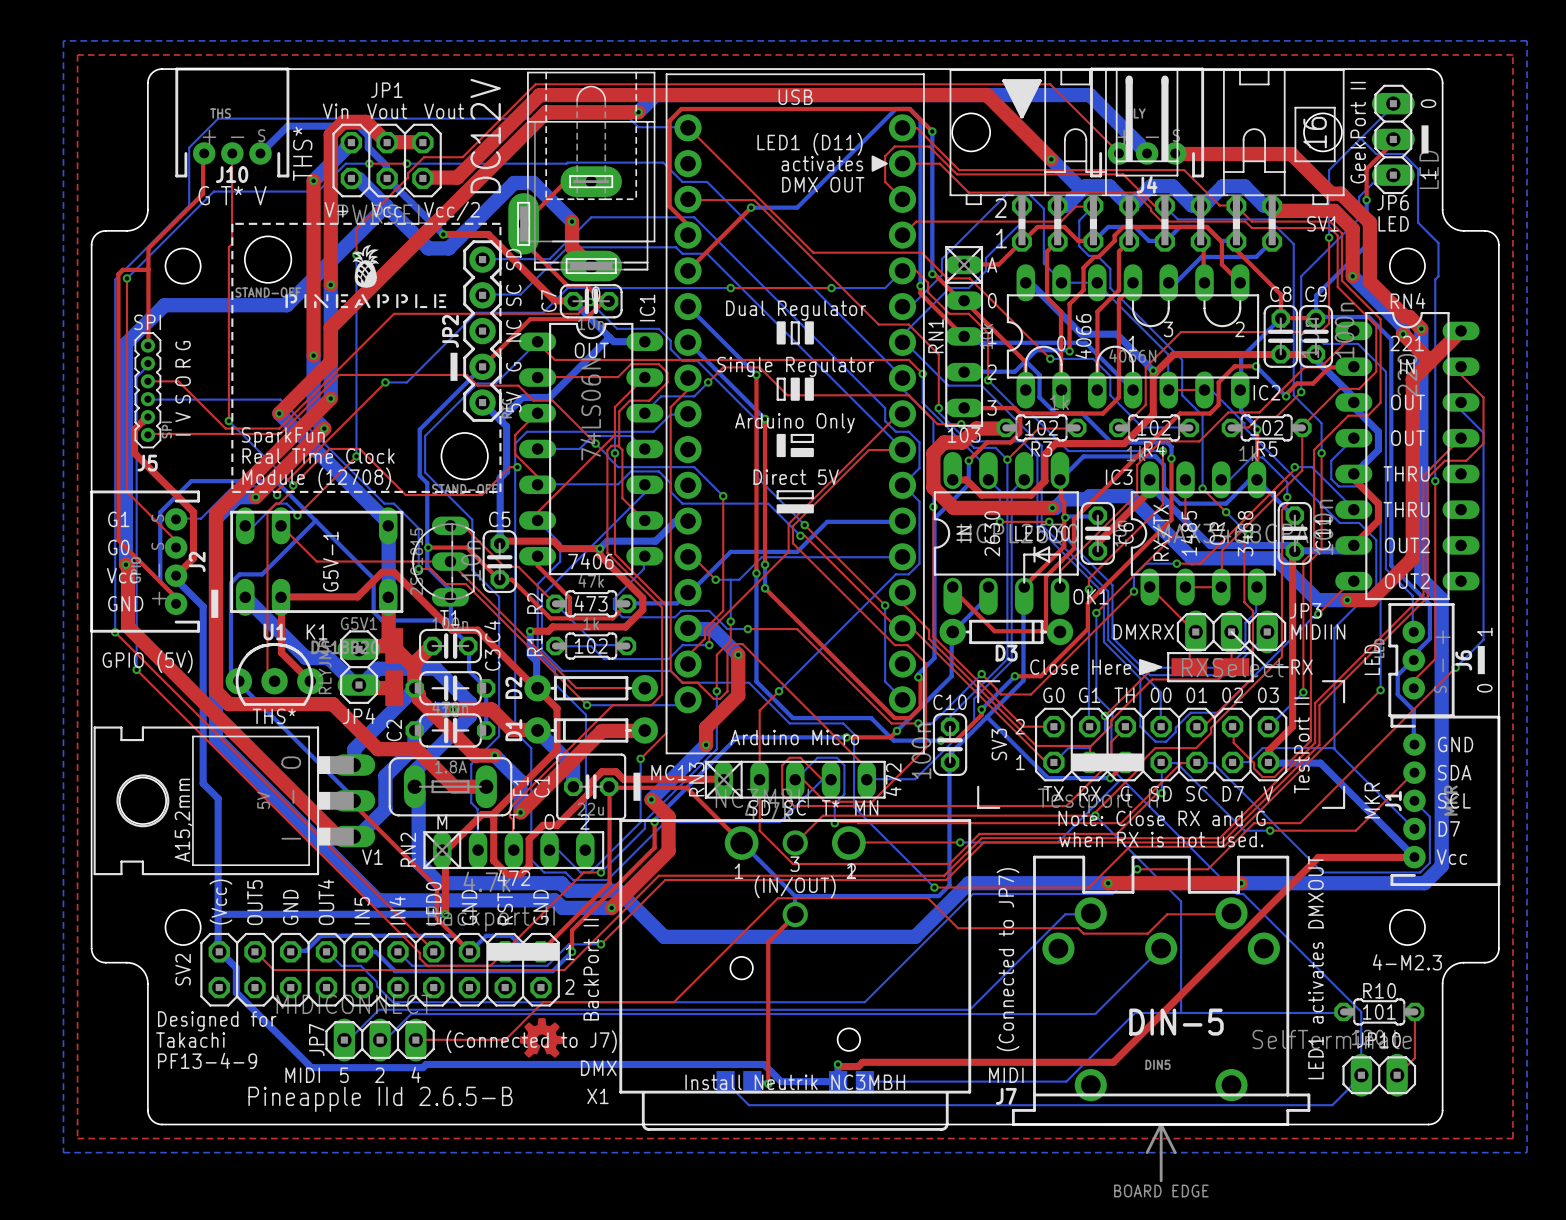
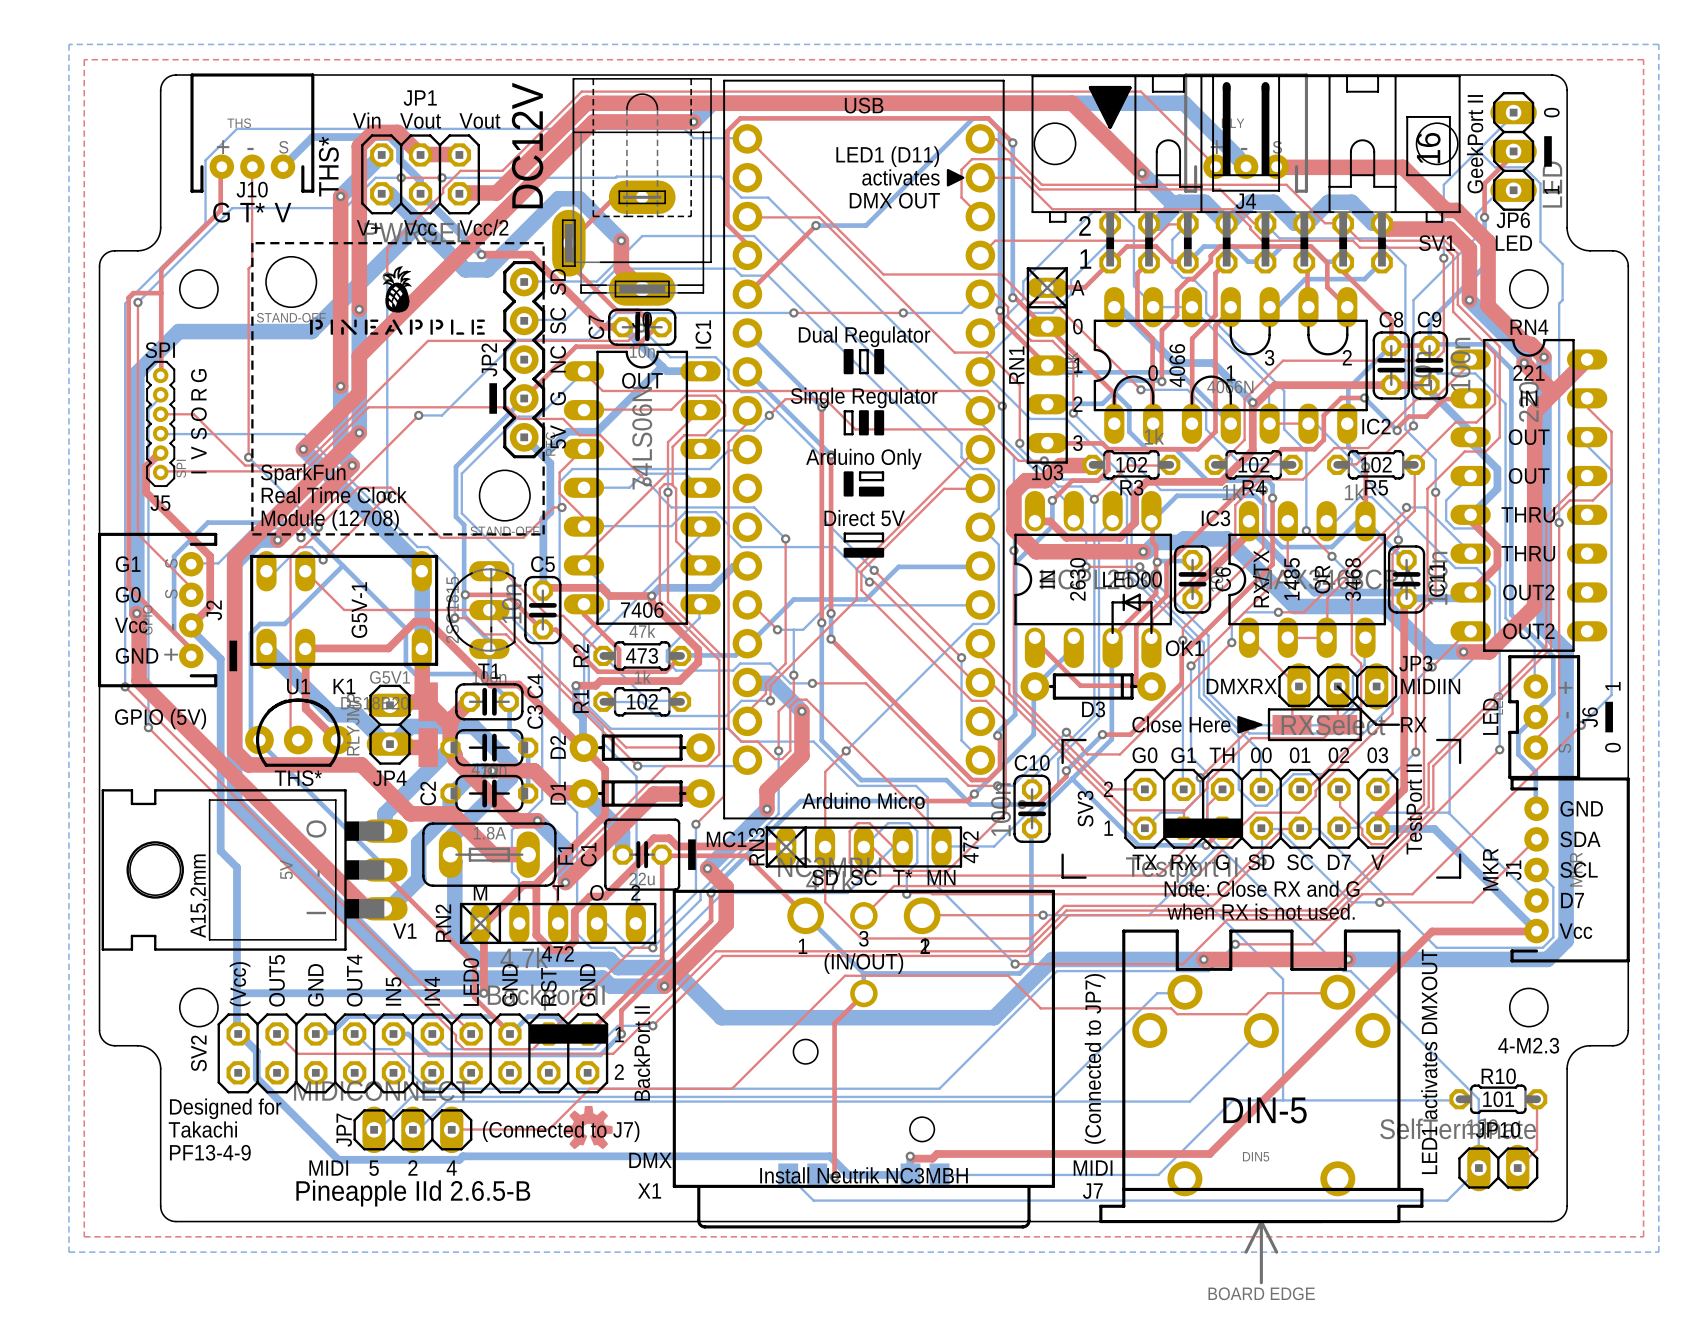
J4 footprint: [1090, 67, 1205, 178] -> [1184, 73, 1309, 193]

